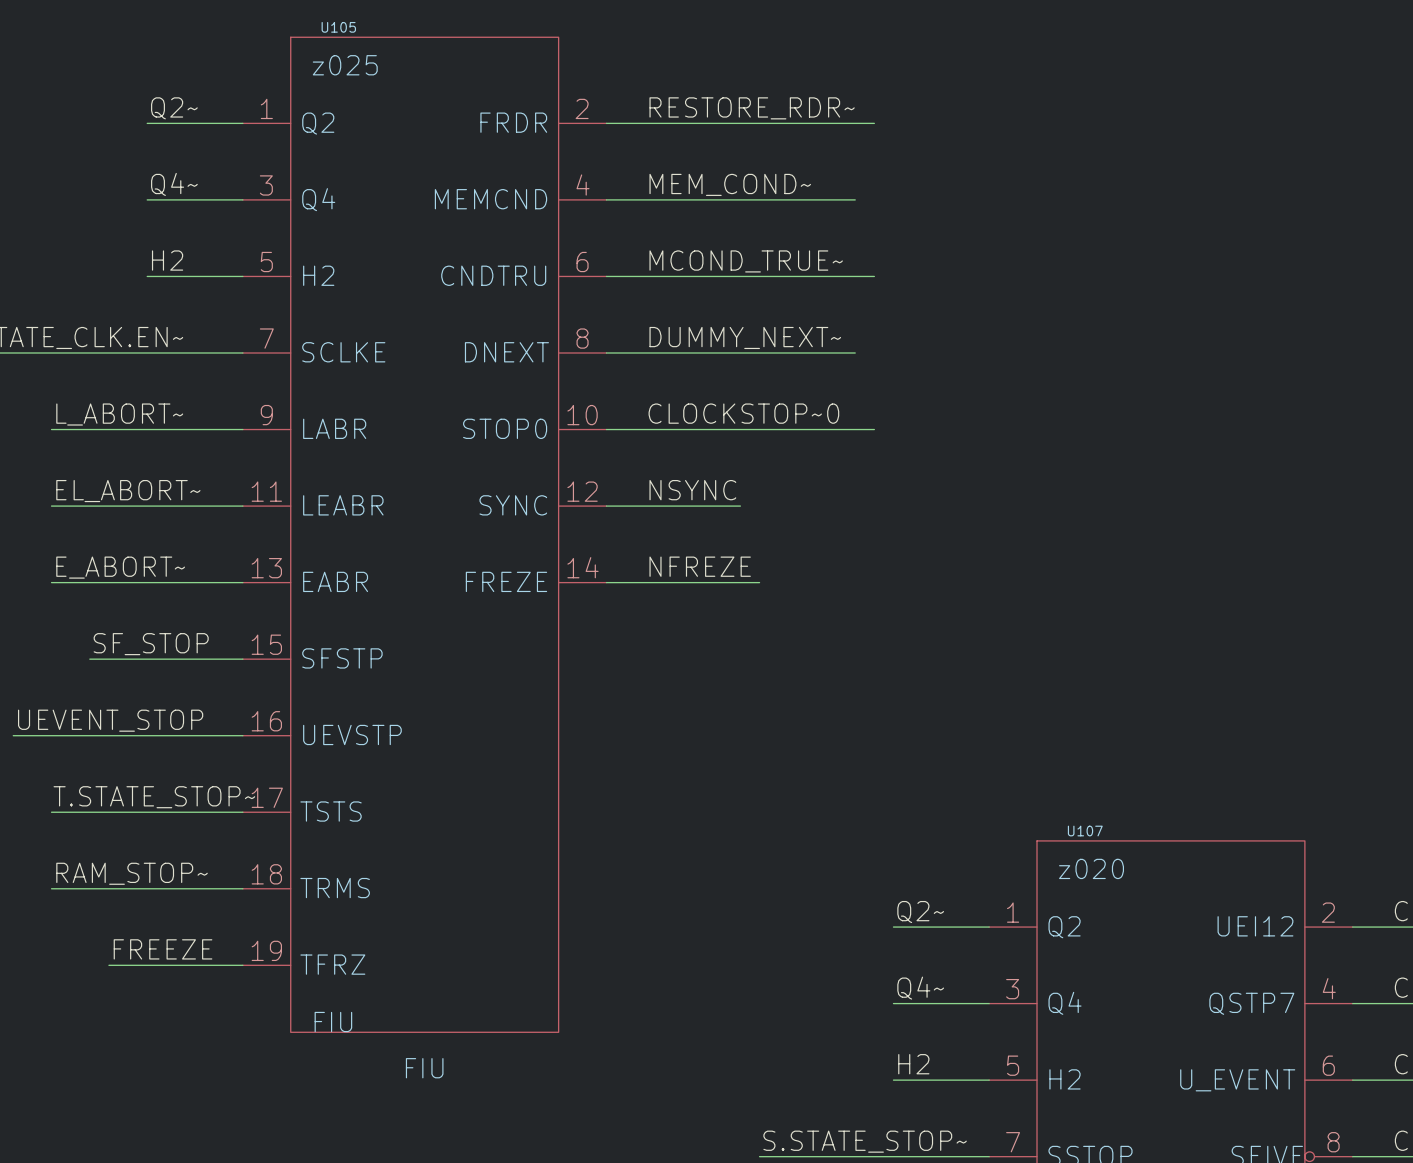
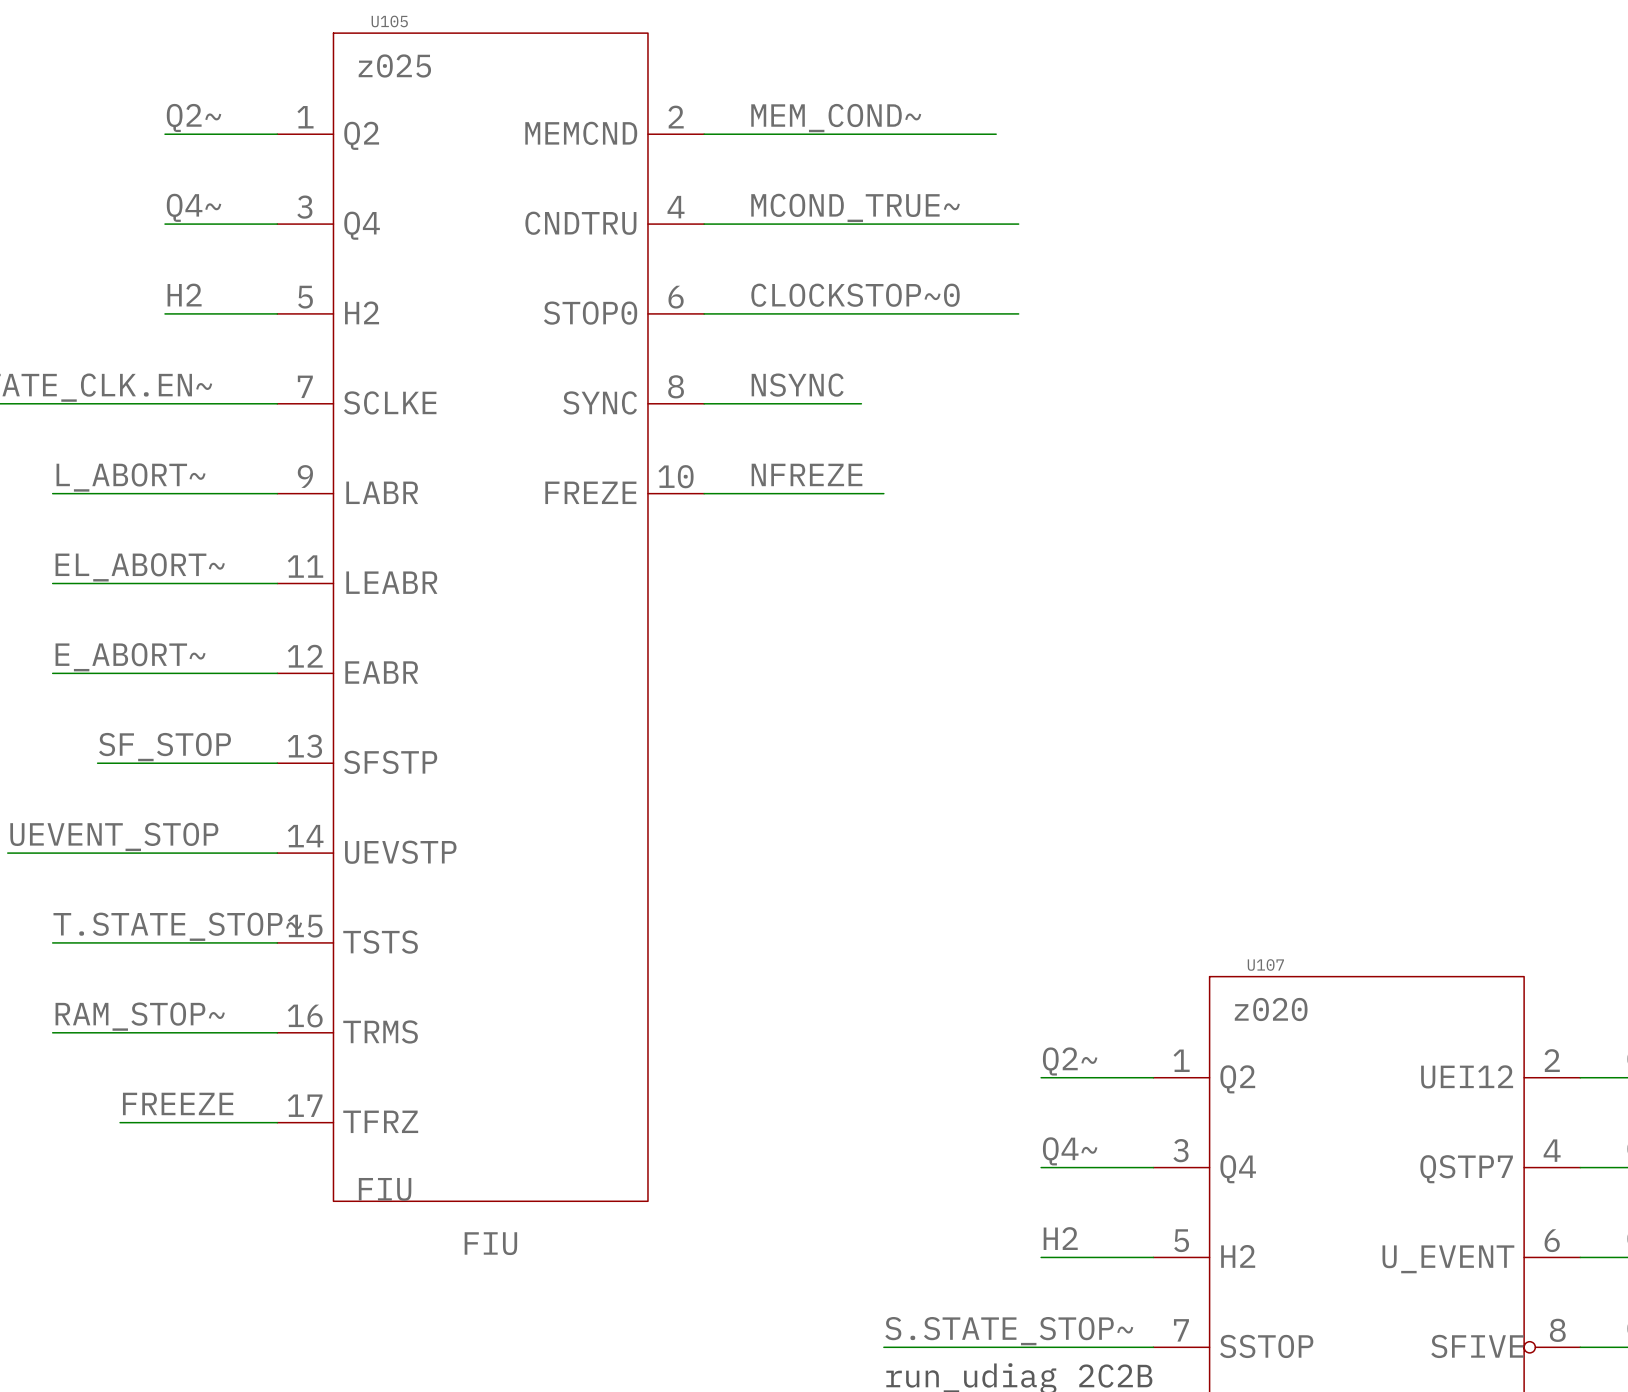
U105 symbol: [242, 37, 607, 1033] -> [277, 33, 705, 1202]
label: RESTORE_RDR~ (752, 108) -> MEM_COND~ (836, 118)
wire: (855, 123) (874, 123) -> (996, 224) (1018, 224)
label: MEM_COND~ (730, 184) -> MCOND_TRUE~ (855, 207)
label: MCOND_TRUE~ (746, 261) -> CLOCKSTOP~0 (855, 295)
label: DUMMY_NEXT~ (745, 337) -> NSYNC (797, 385)
wire: (740, 352) (855, 352) -> none
label: CLOCKSTOP~0 (743, 413) -> NFREZE (807, 474)
wire: (759, 429) (874, 429) -> none
label: NSYNC (692, 490) -> none
wire: (606, 506) (740, 506) -> none
label: NFREZE (700, 566) -> none
wire: (606, 582) (759, 582) -> none

